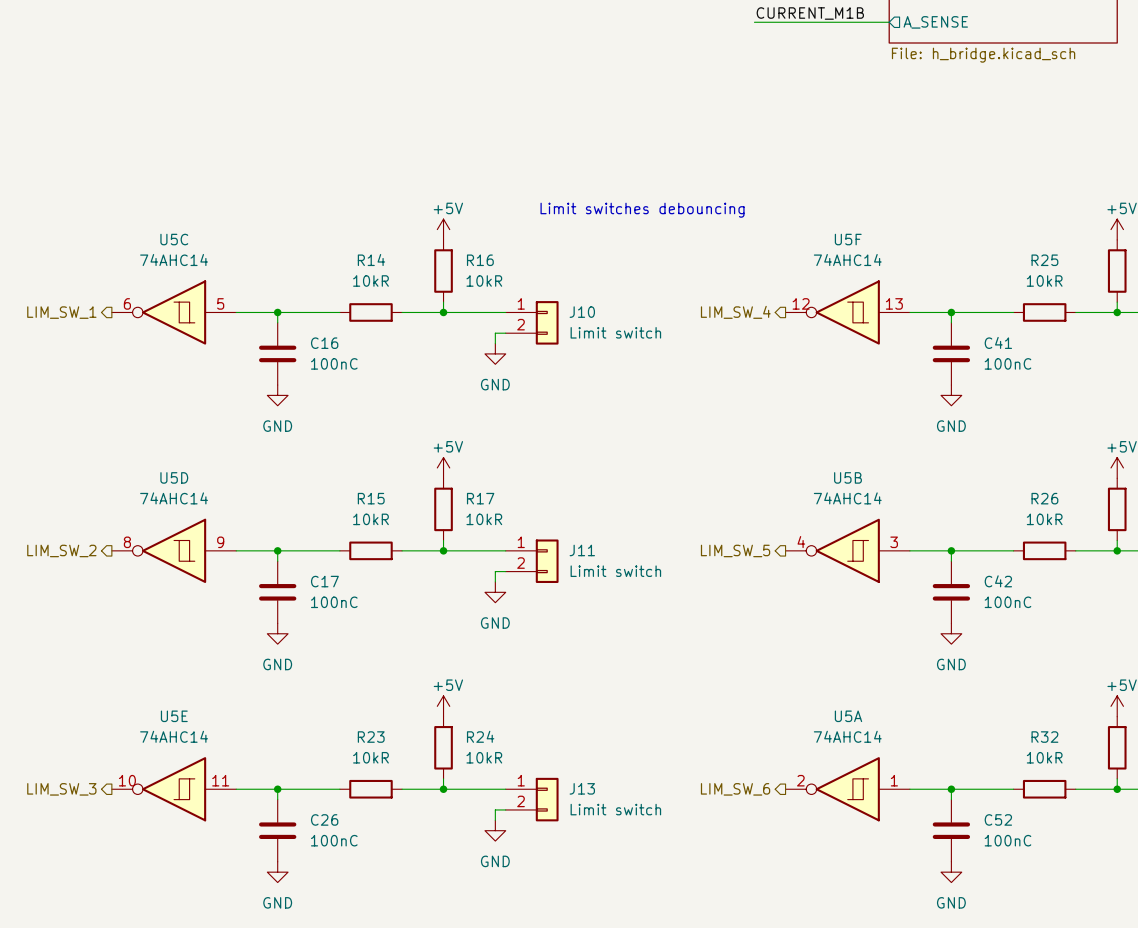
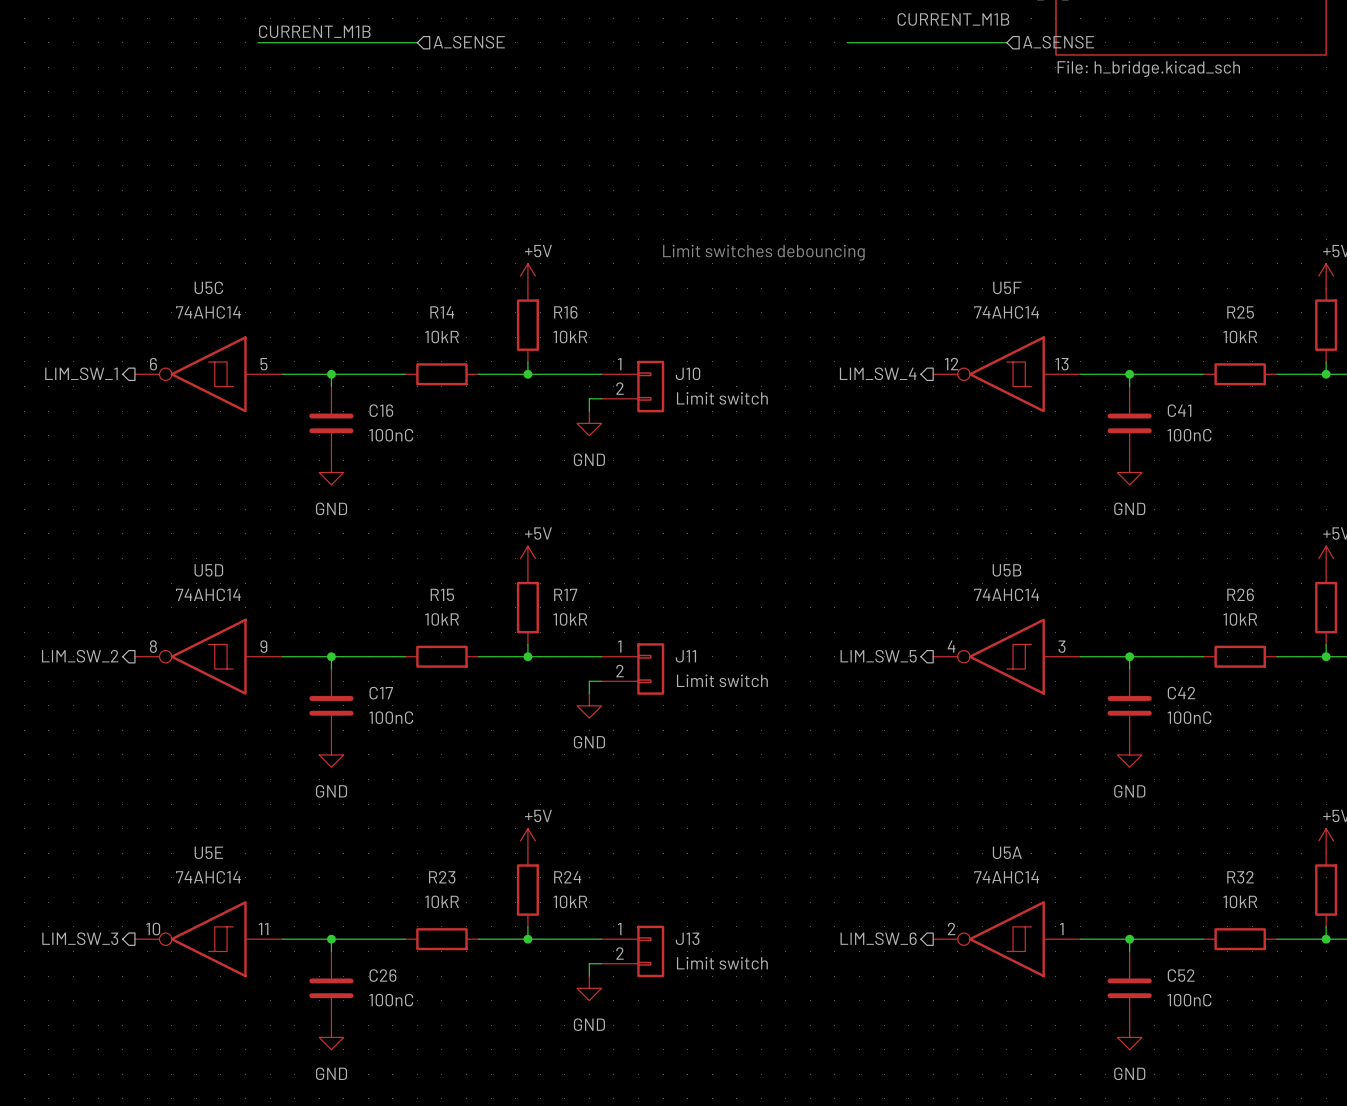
wire: (754, 22) (889, 22) -> (847, 42) (1006, 42)
sheet pin position: A_SENSE (935, 22) -> A_SENSE (1058, 42)
label: none -> CURRENT_M1B (314, 31)
wire: none -> (257, 42) (417, 42)
sheet pin: none -> A_SENSE (469, 42)

